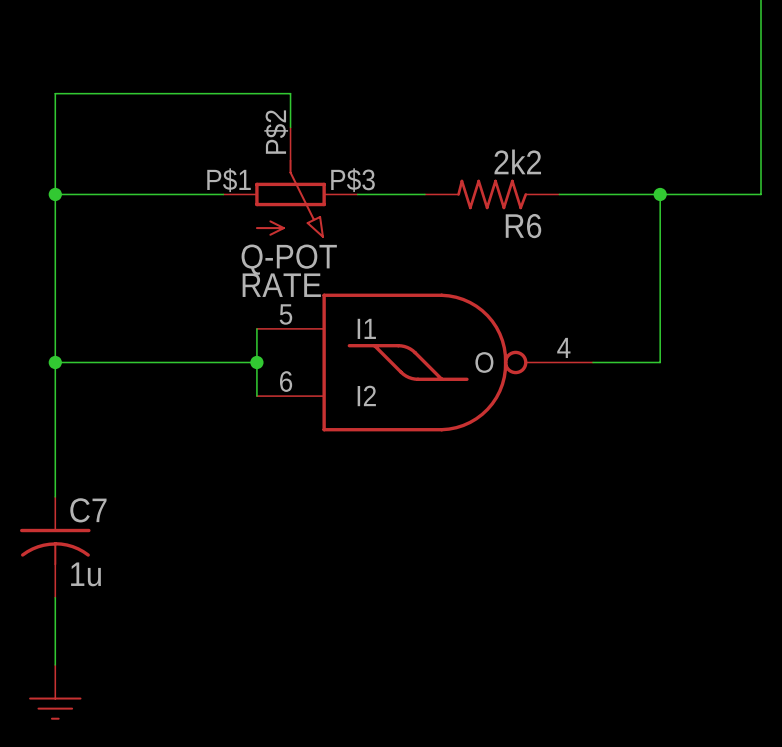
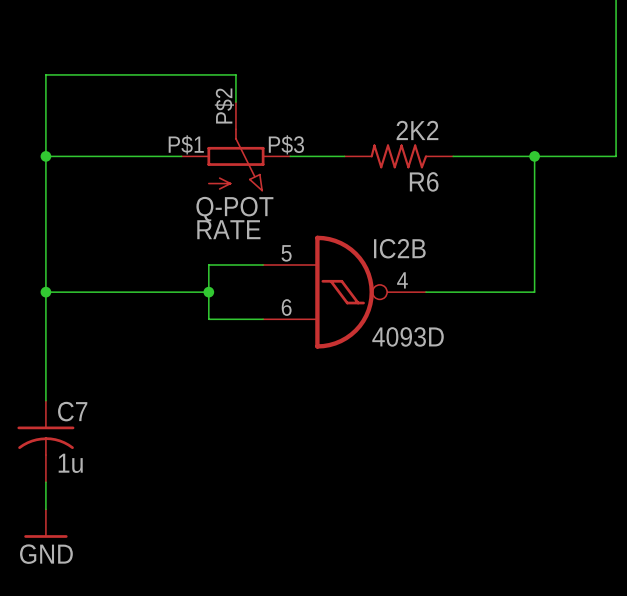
R6 value: 2k2 (517, 161) -> 2K2 (417, 130)
part: (424, 362) -> none
IC2B: none -> 4093D (344, 292)
power symbol: none -> GND (45, 523)
power symbol: (55, 692) -> none

